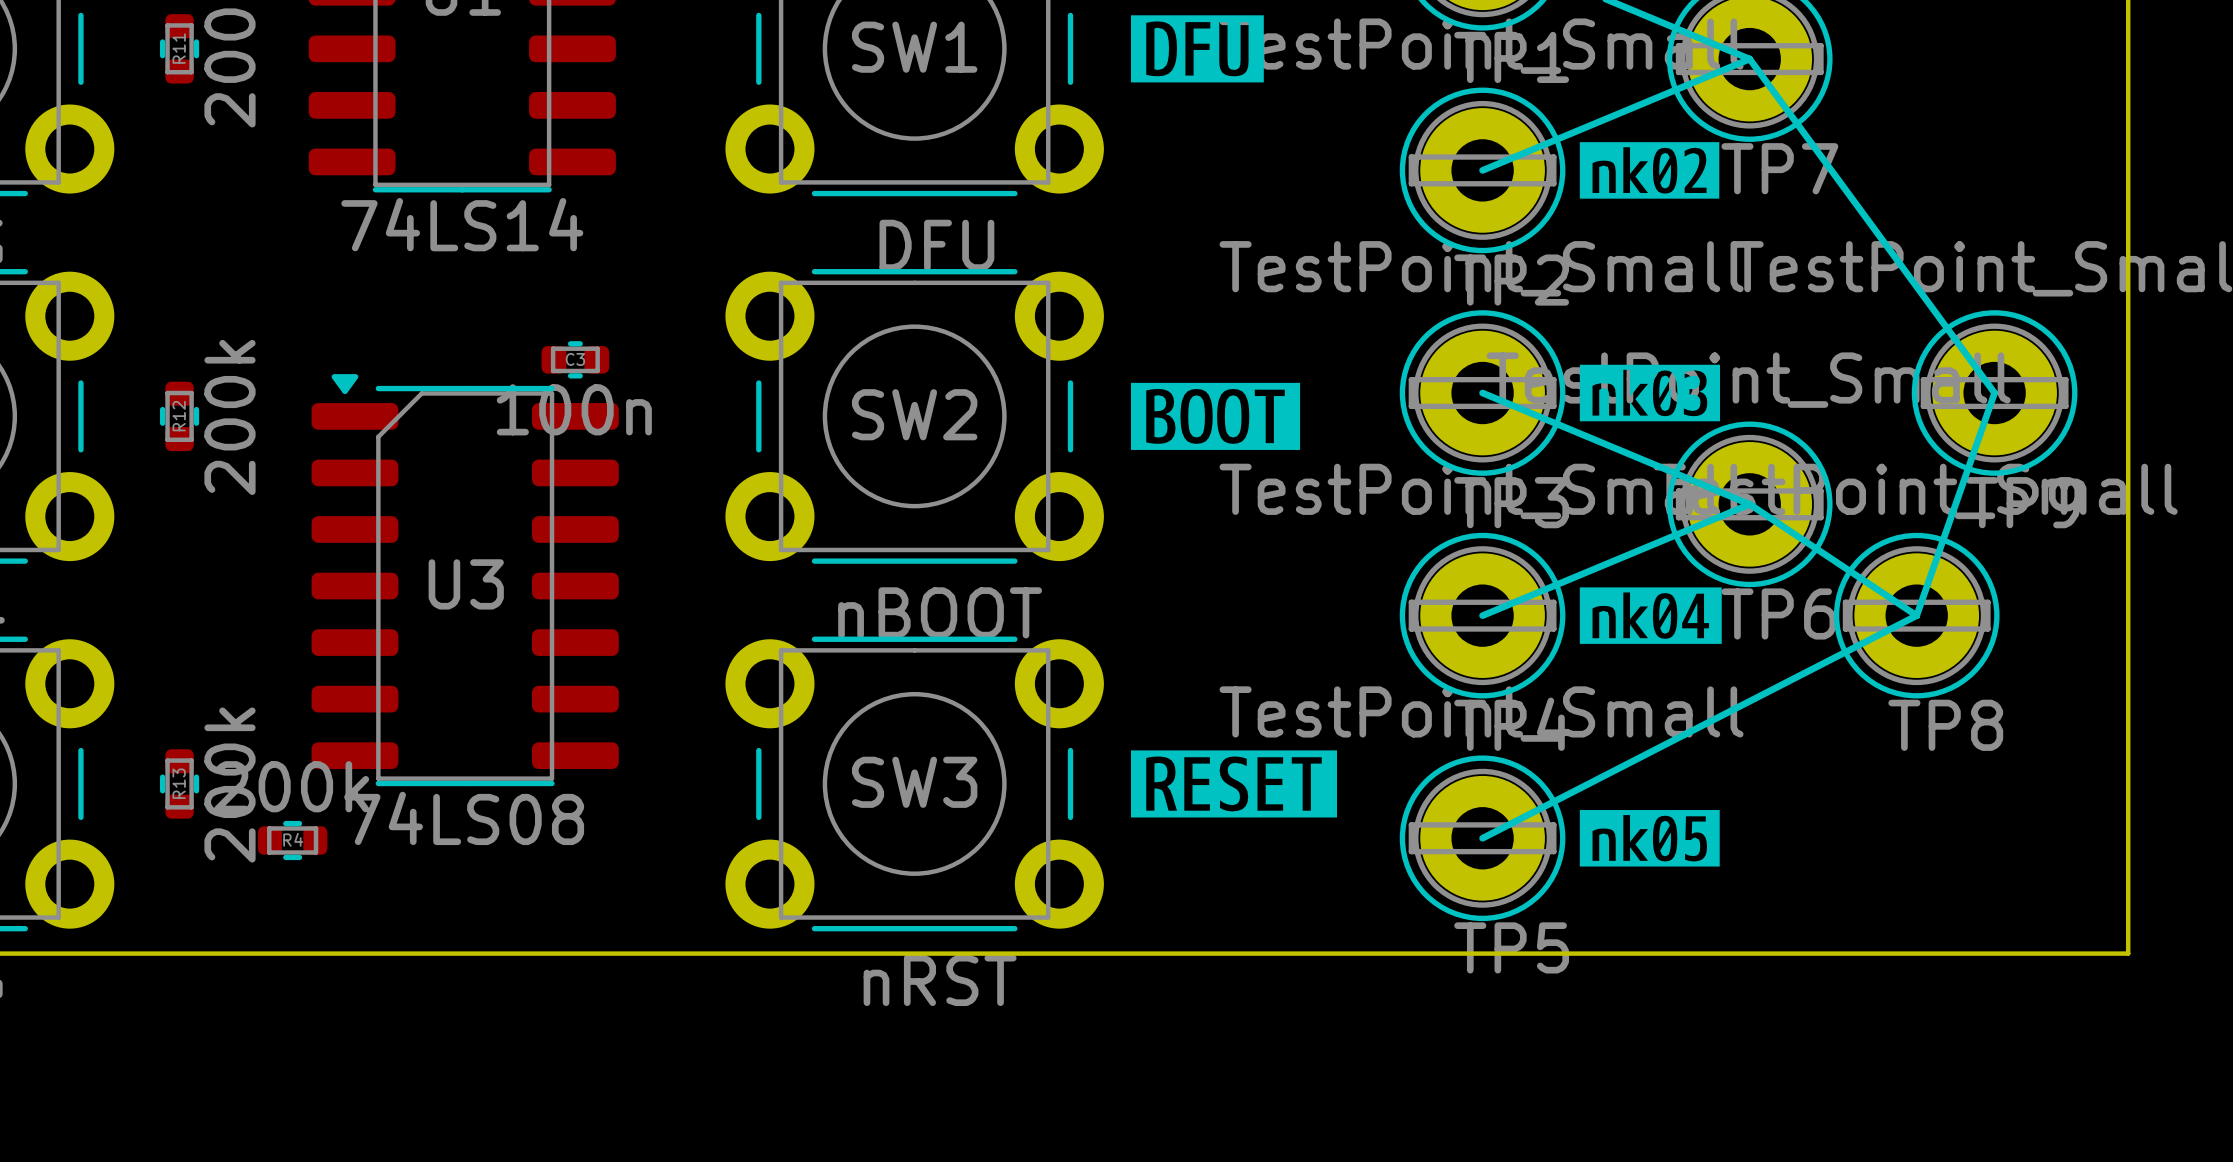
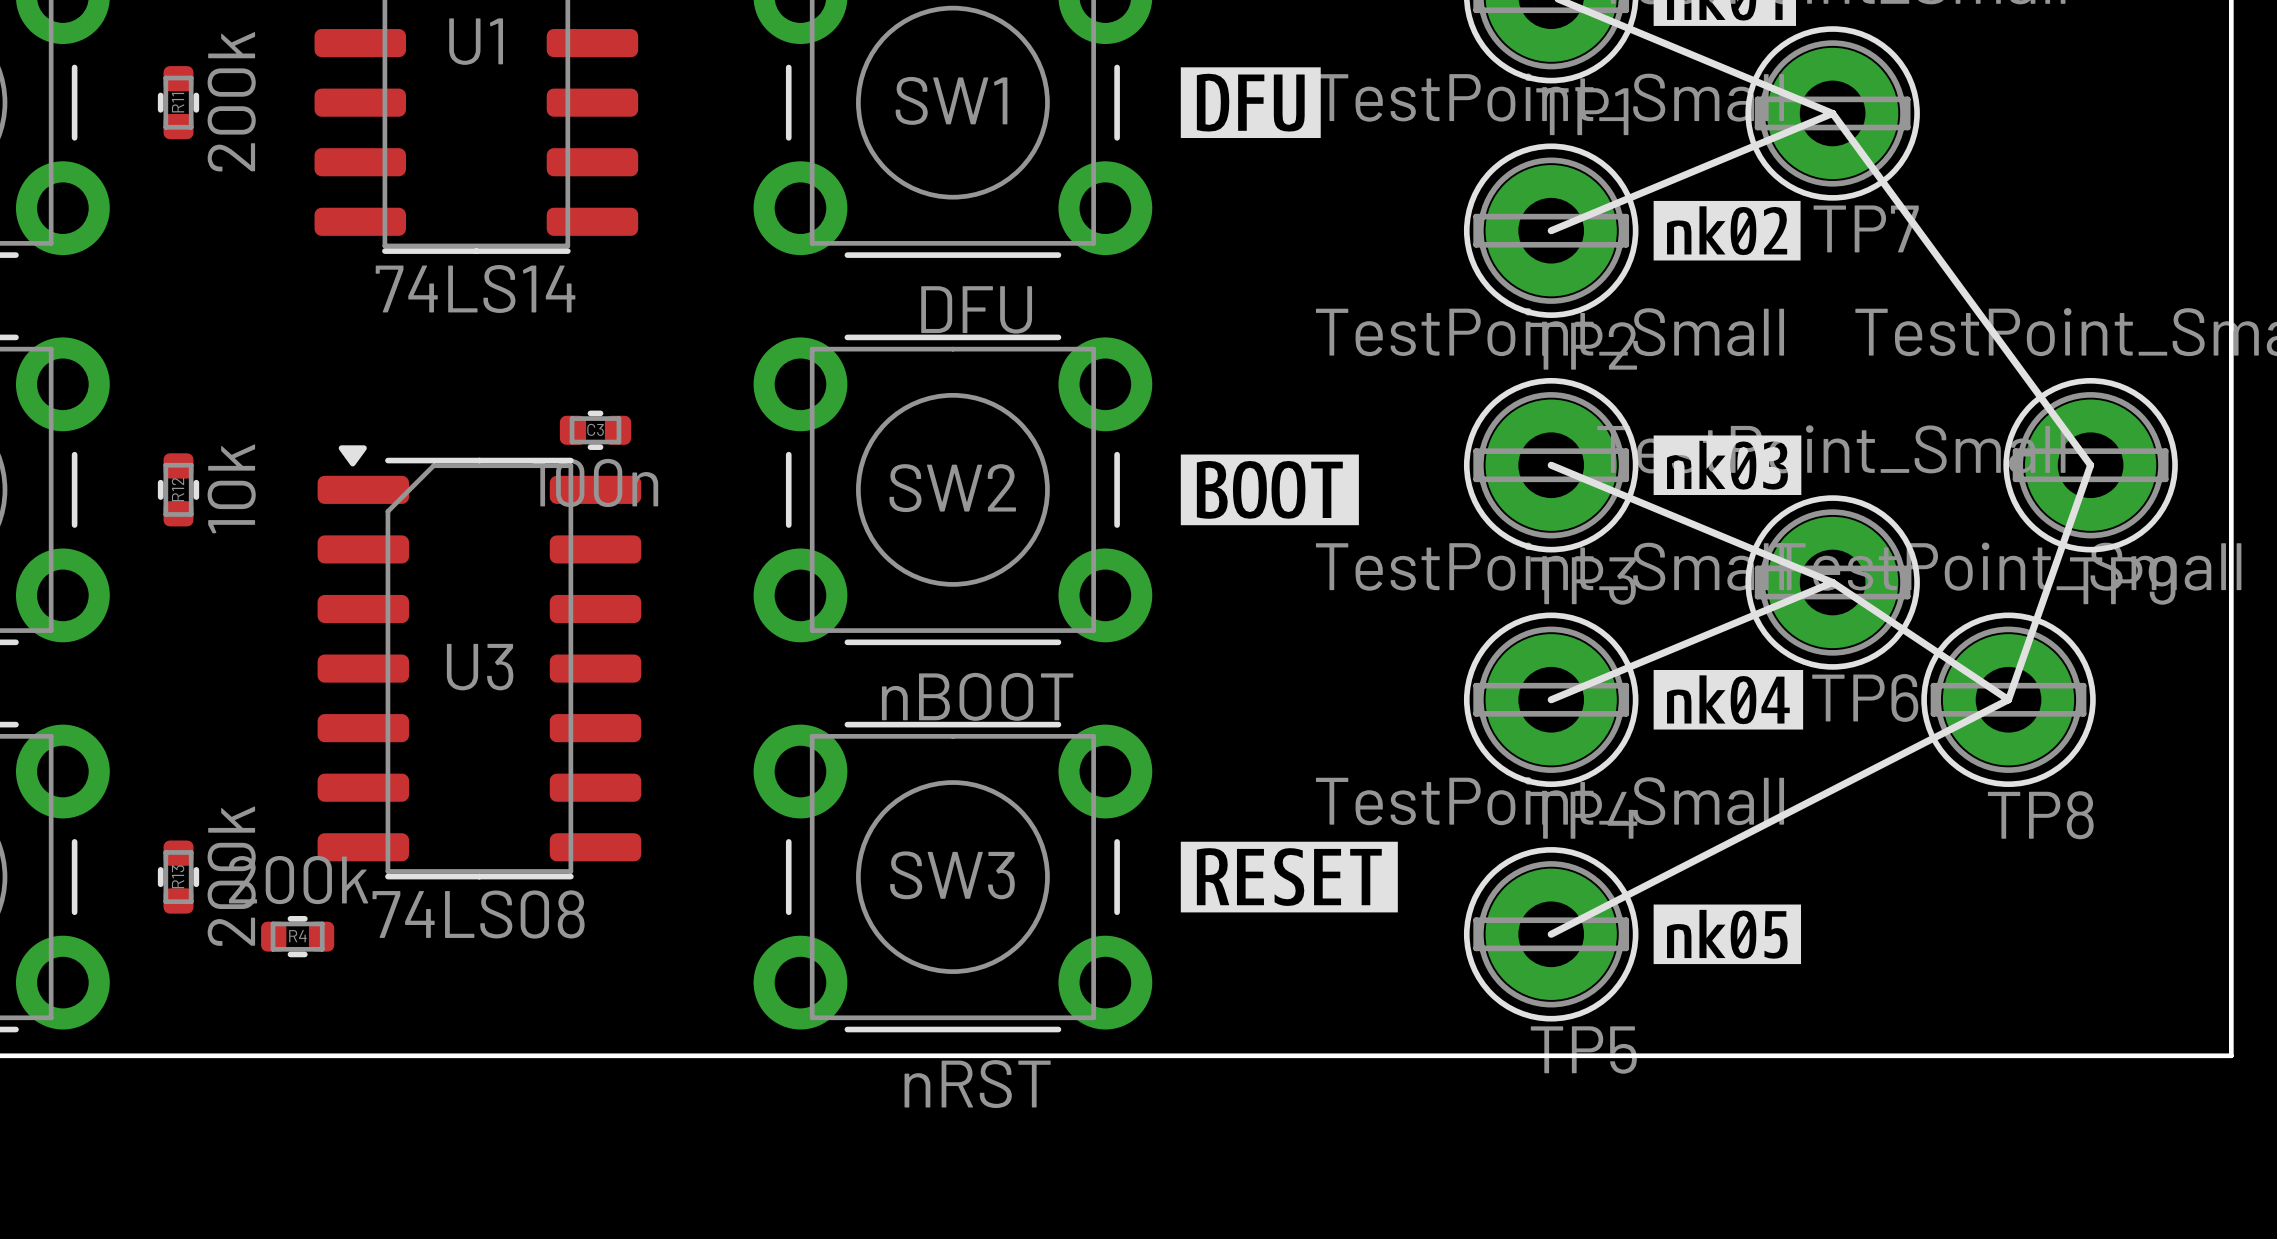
R12 value: 200k (229, 417) -> 10k (231, 488)

